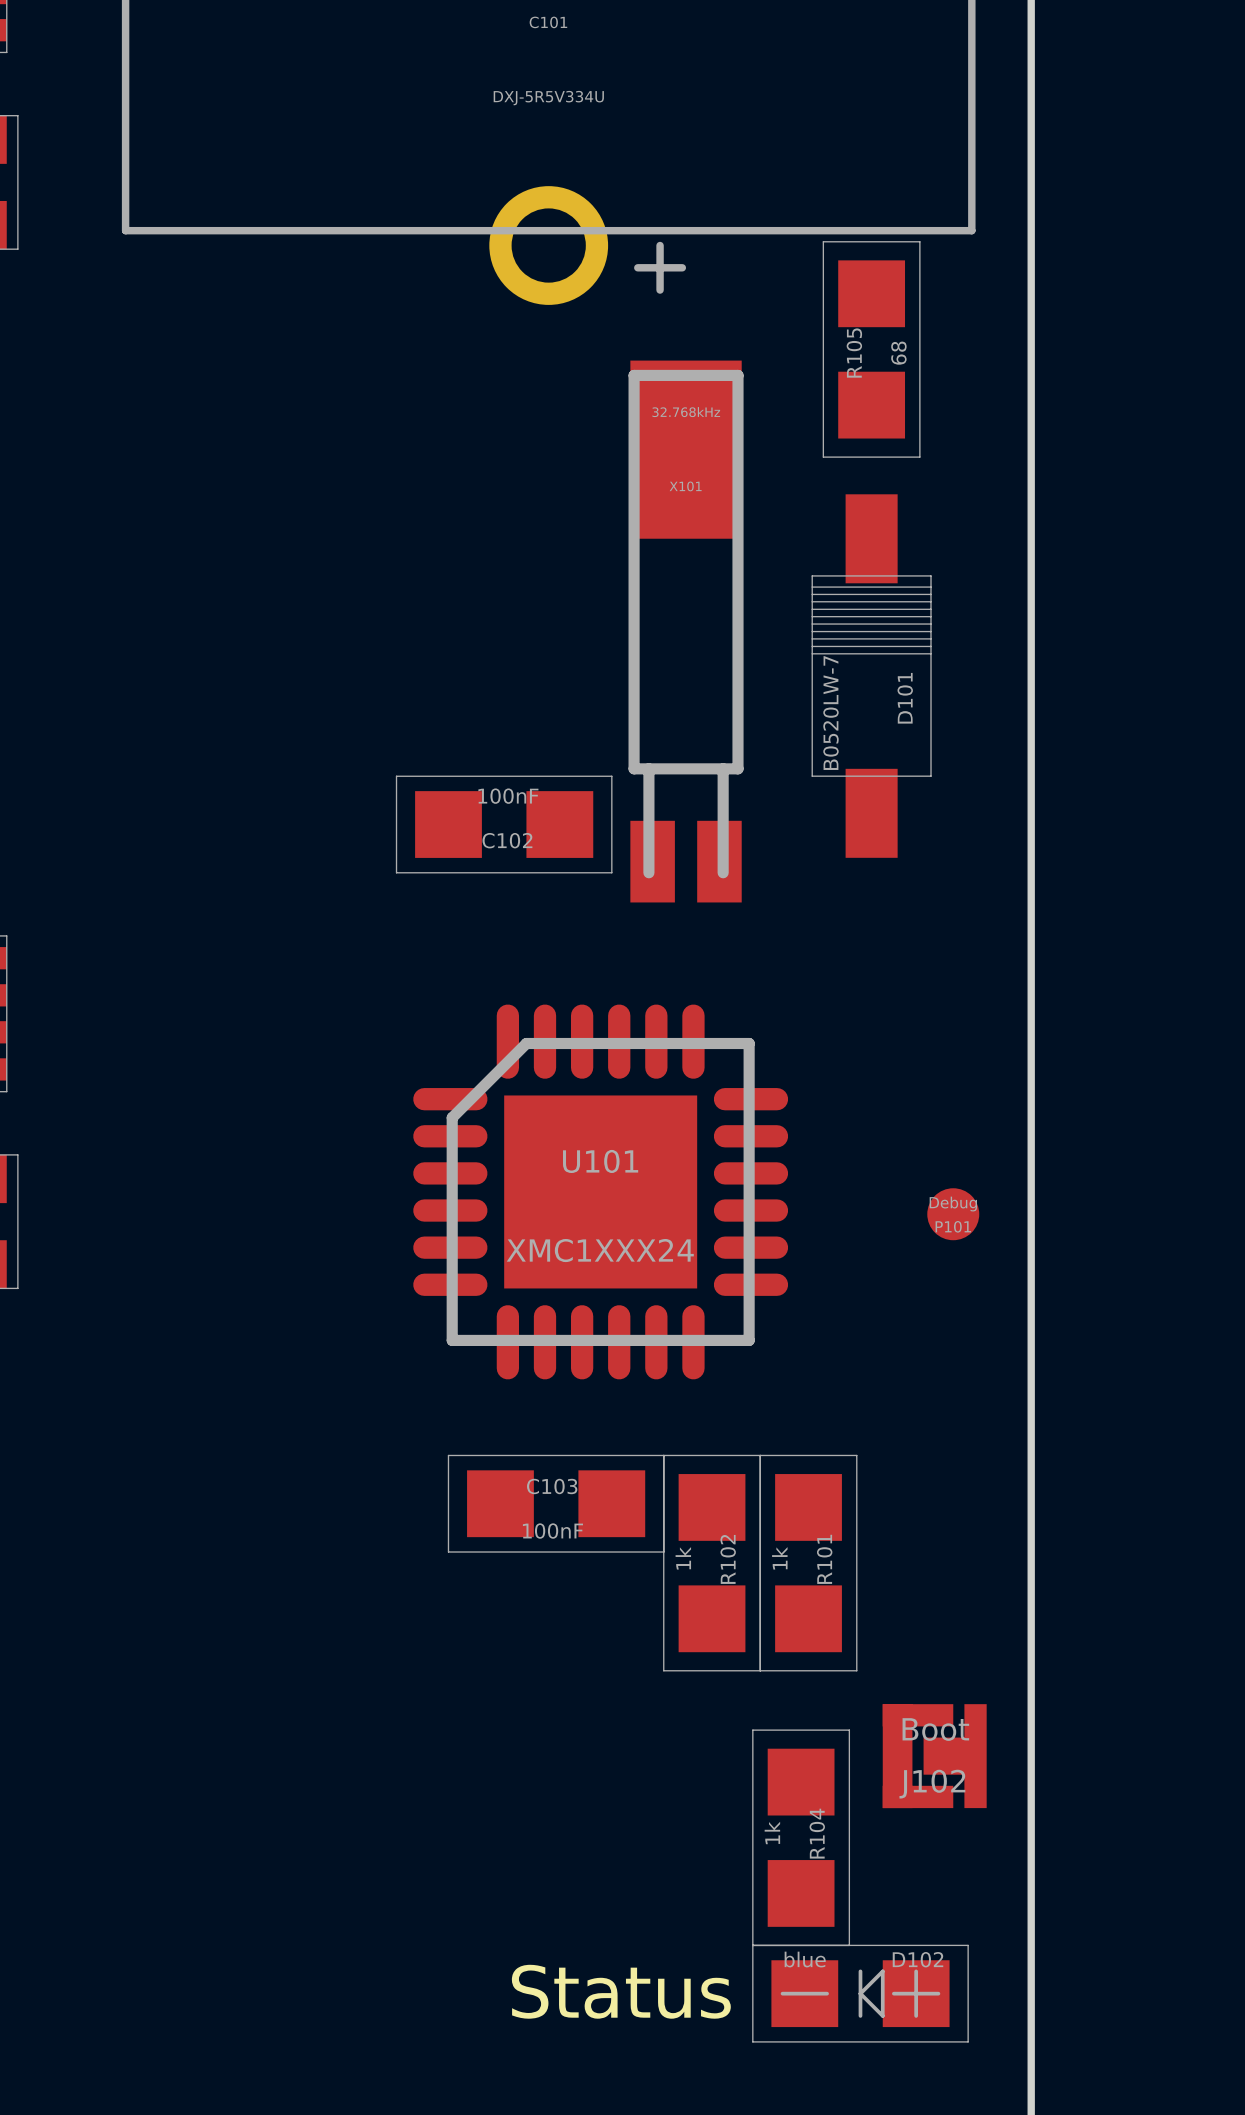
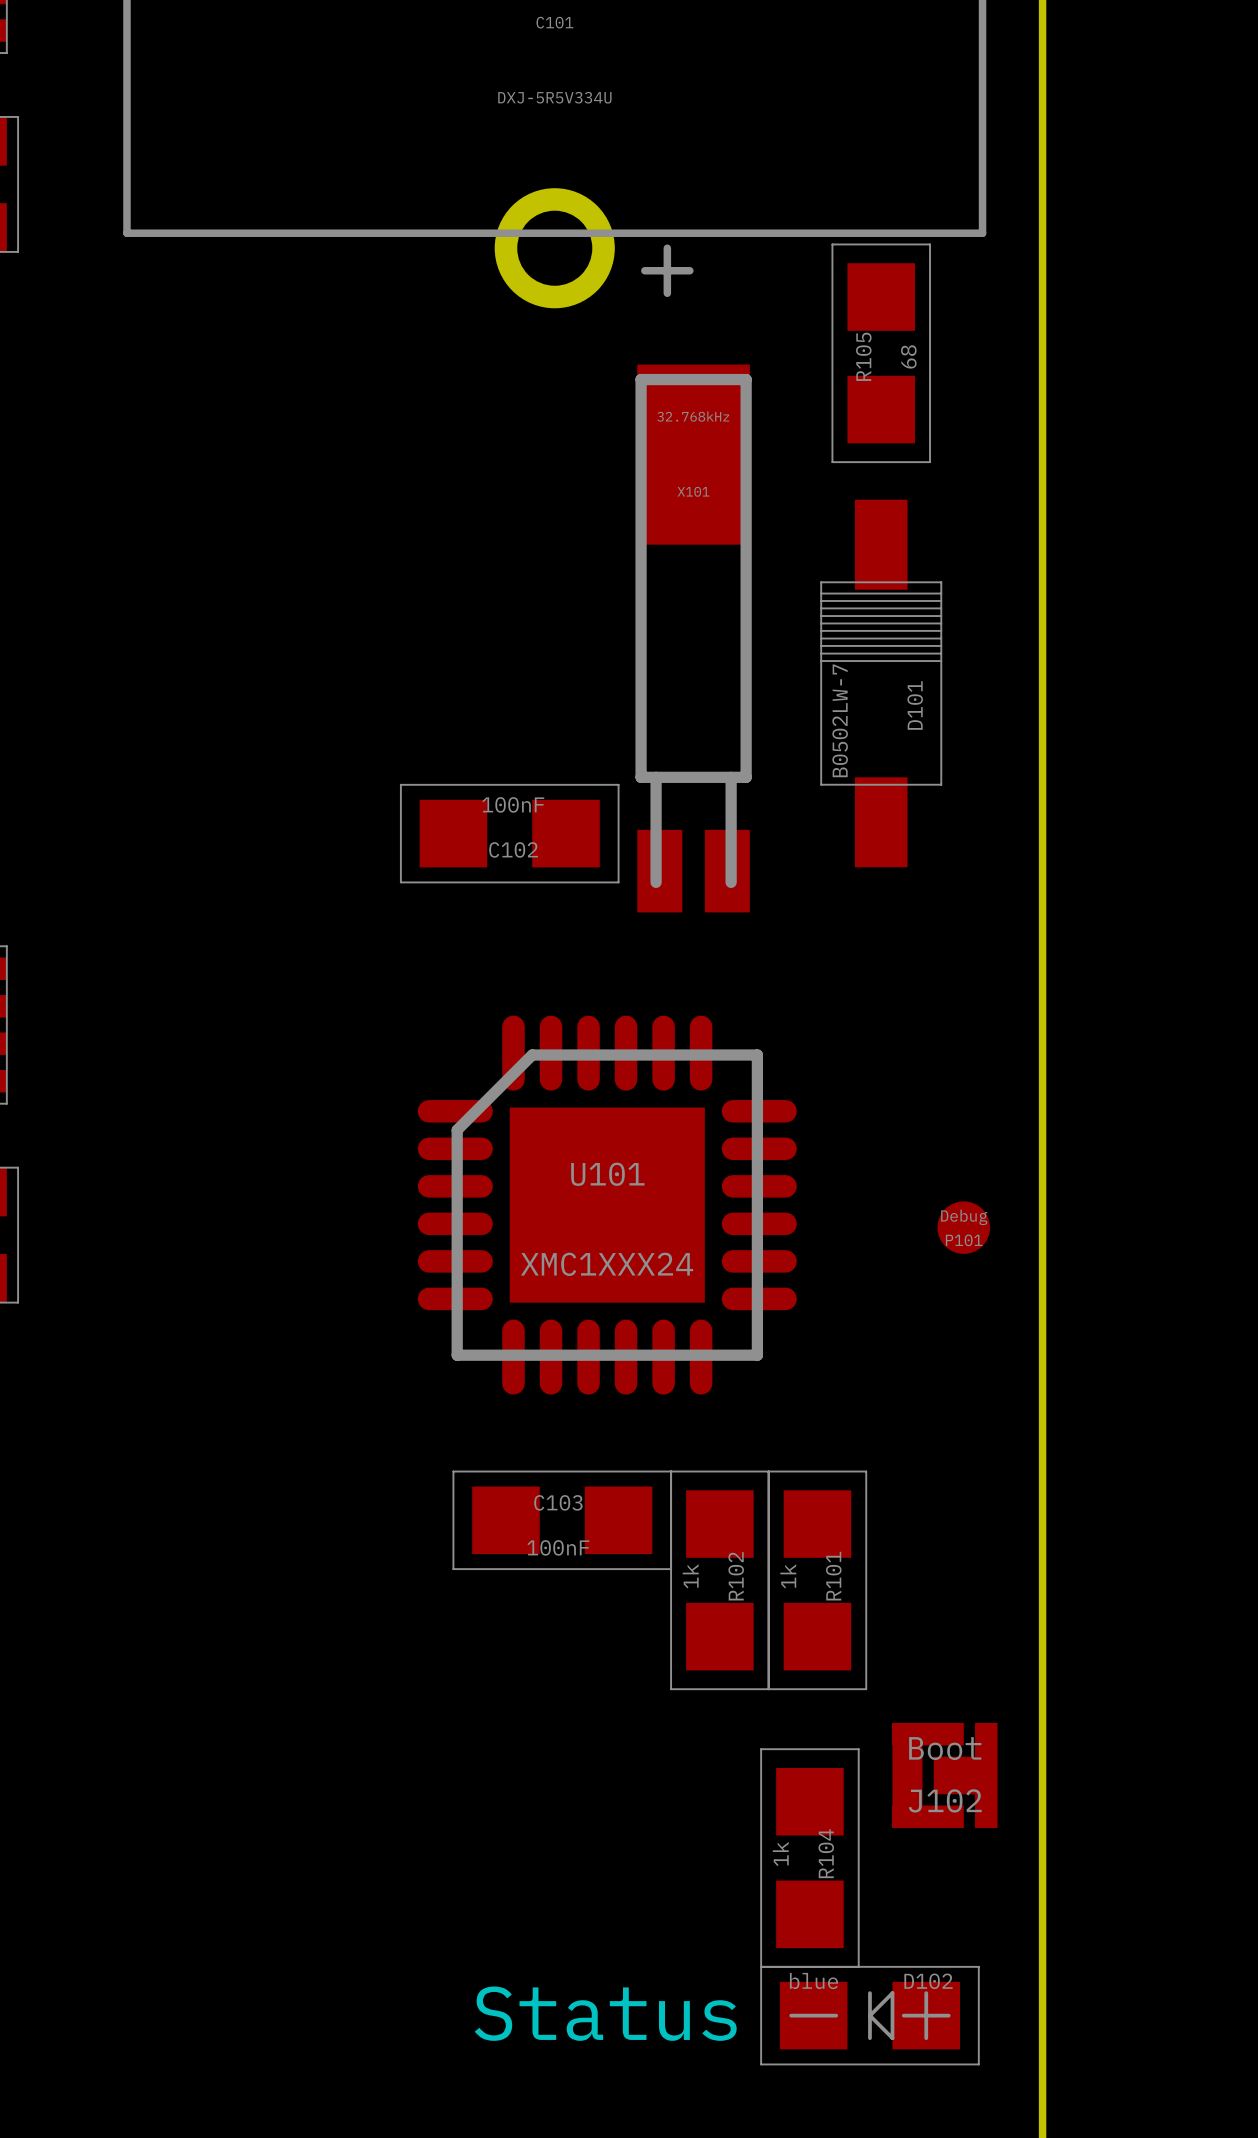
D101 value: B0520LW-7 (830, 713) -> B0502LW-7 (840, 720)

